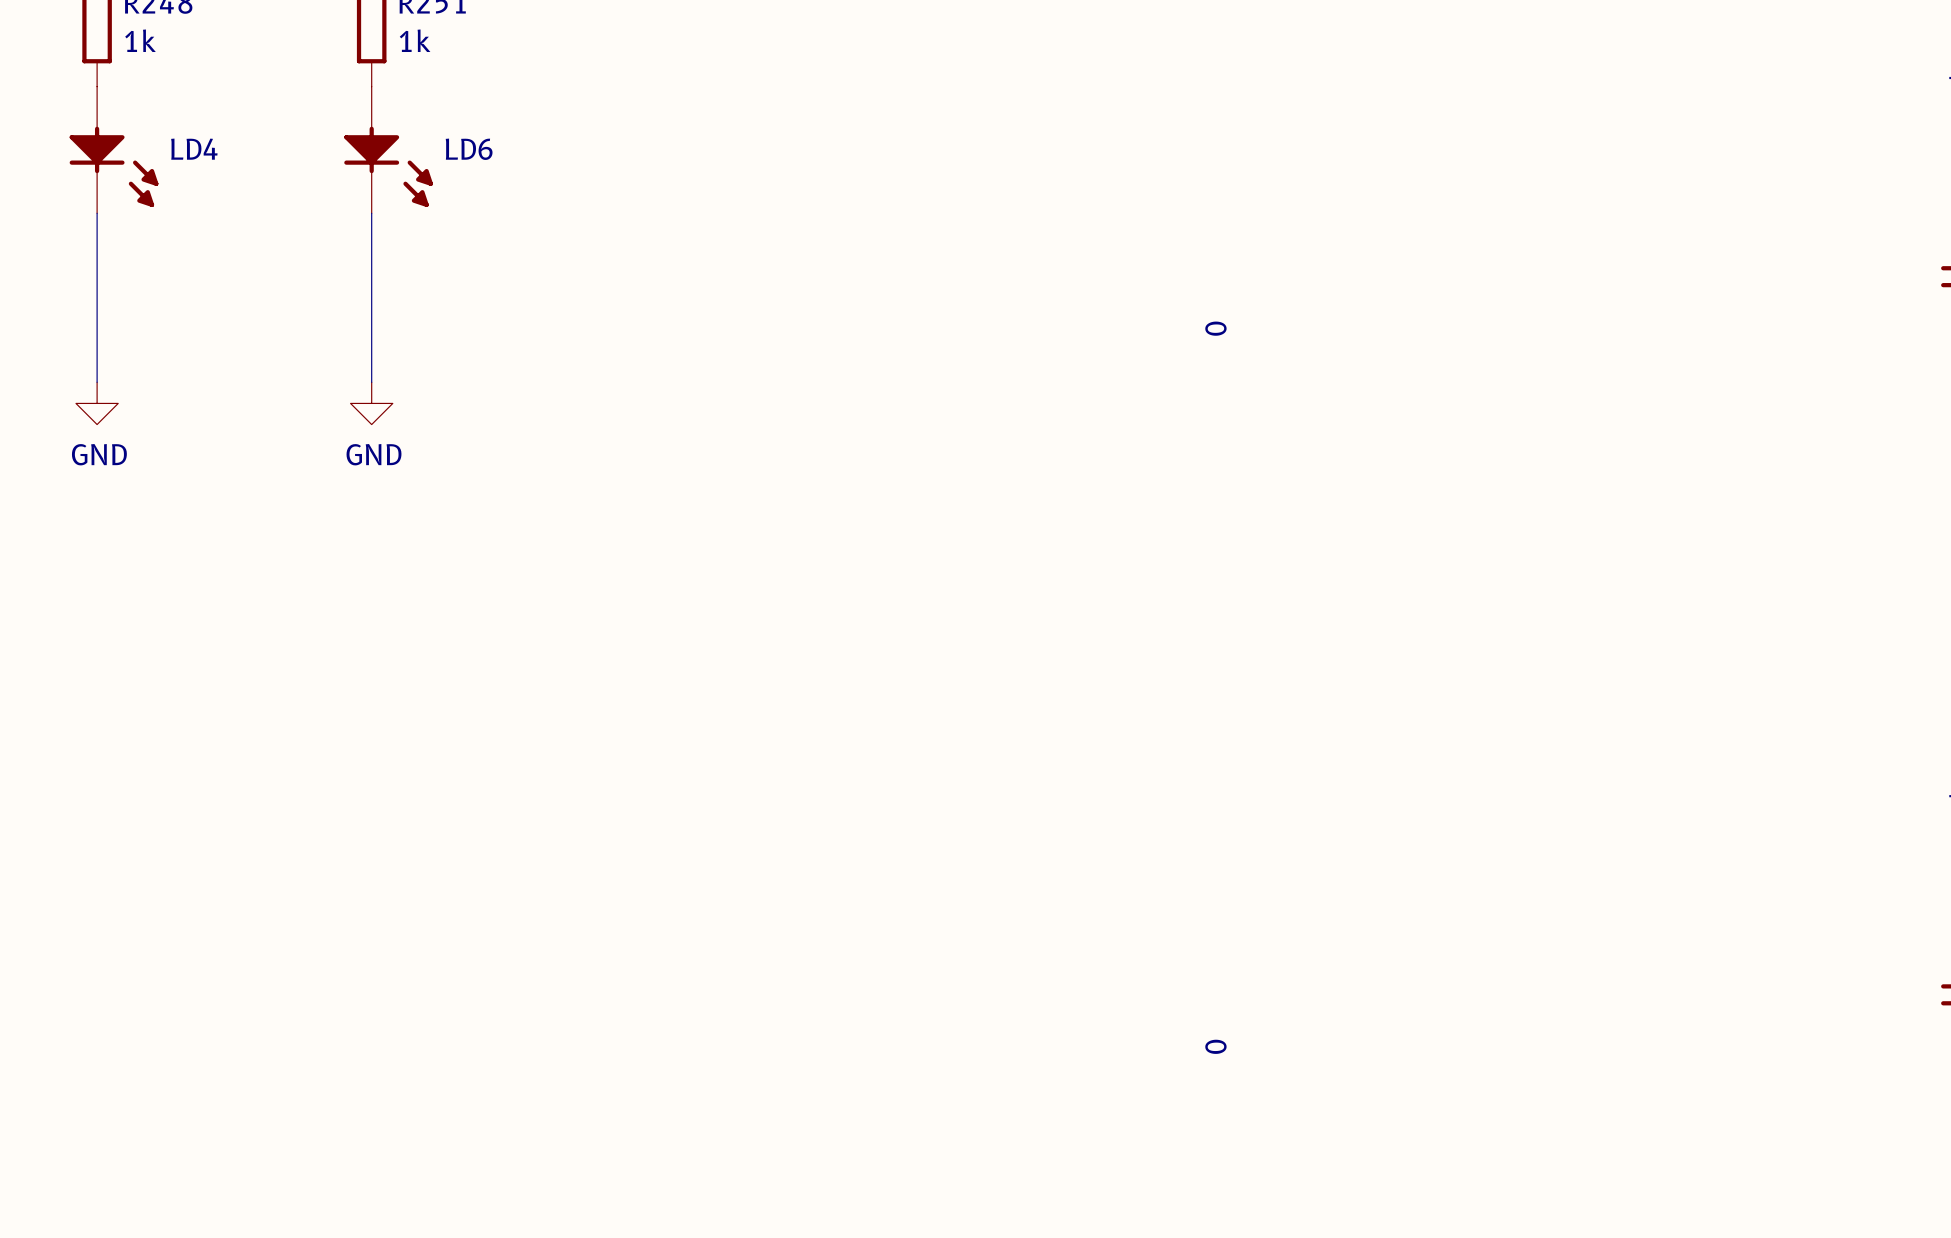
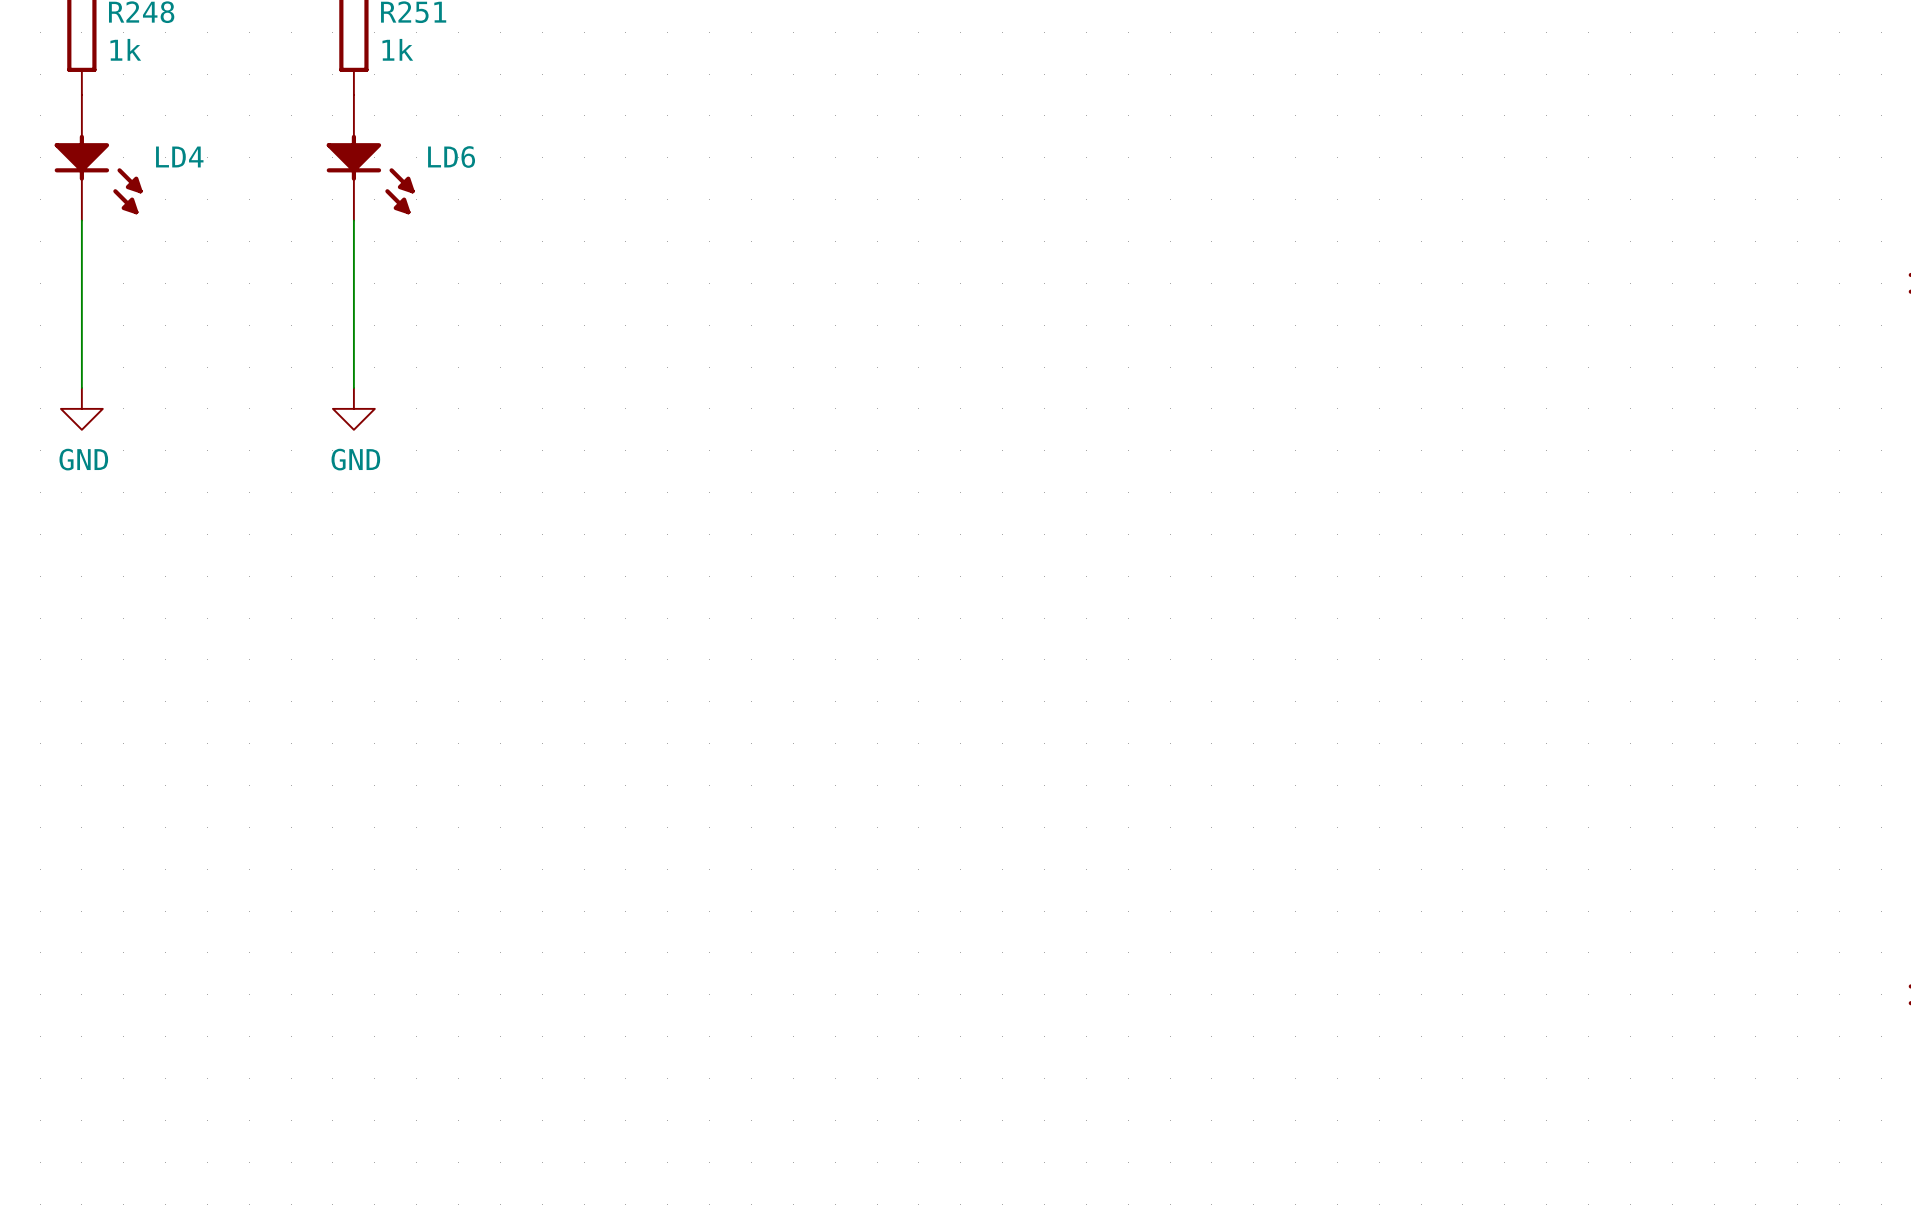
part text: 0 (1215, 328) -> none
part text: 0 (1215, 1046) -> none

